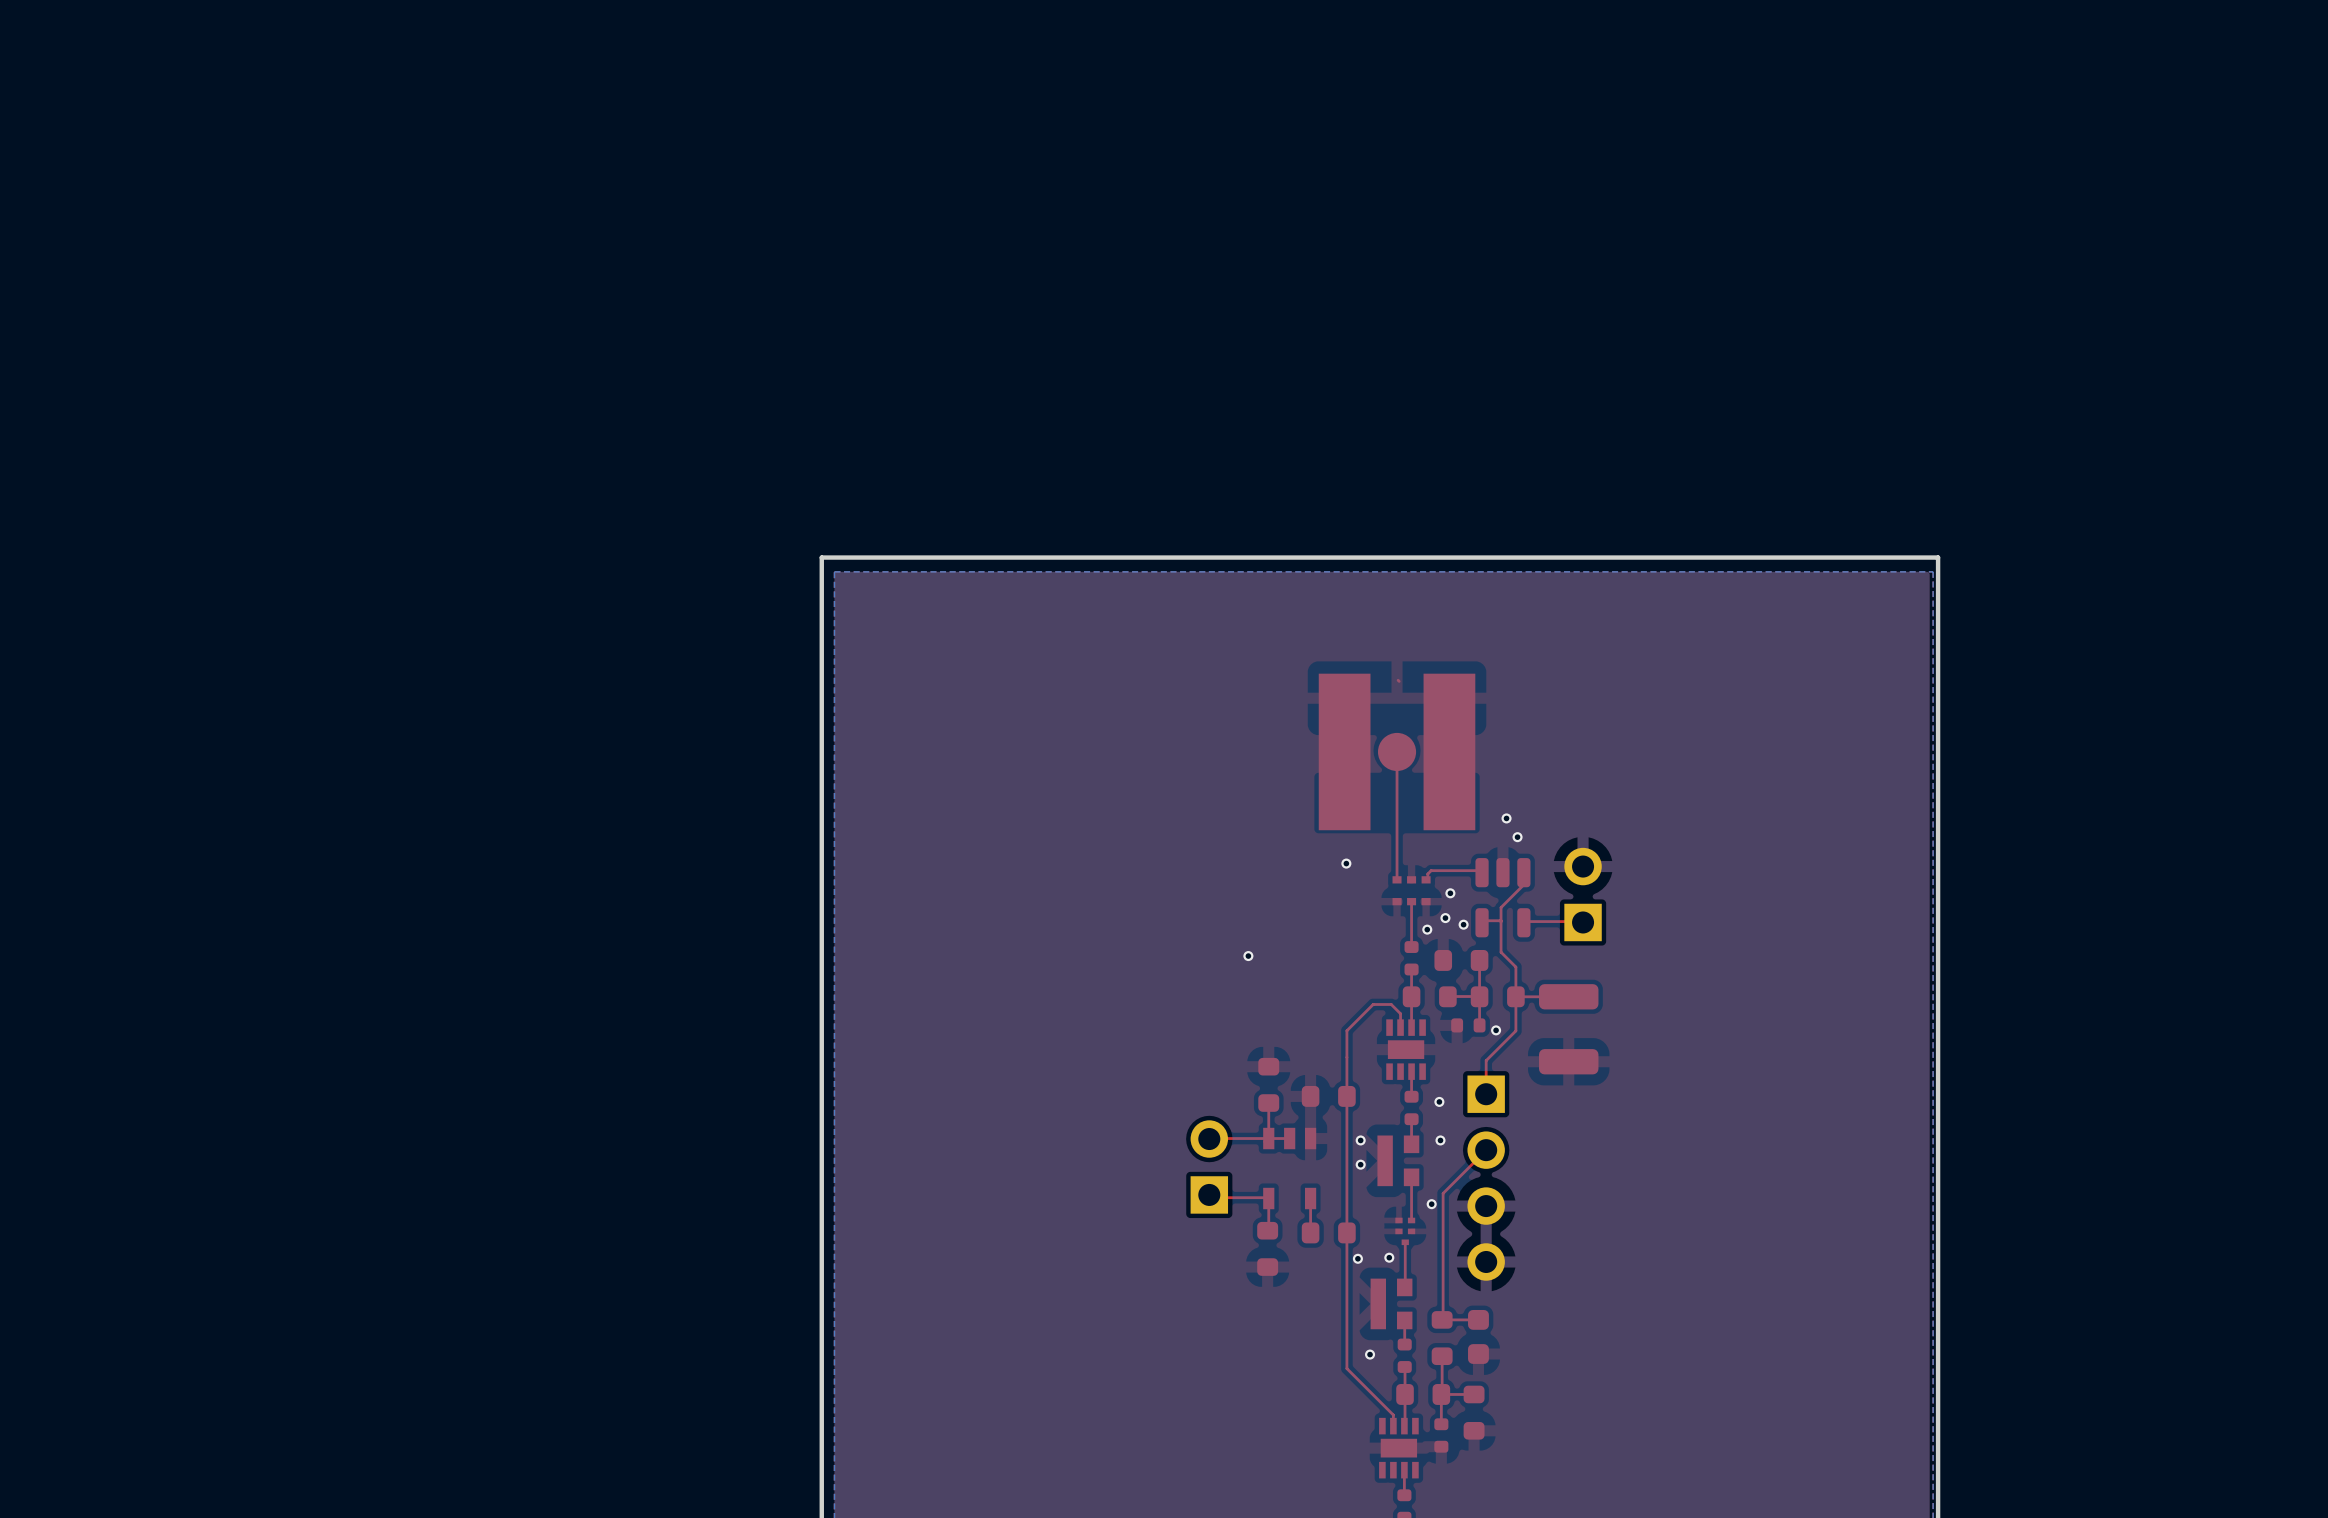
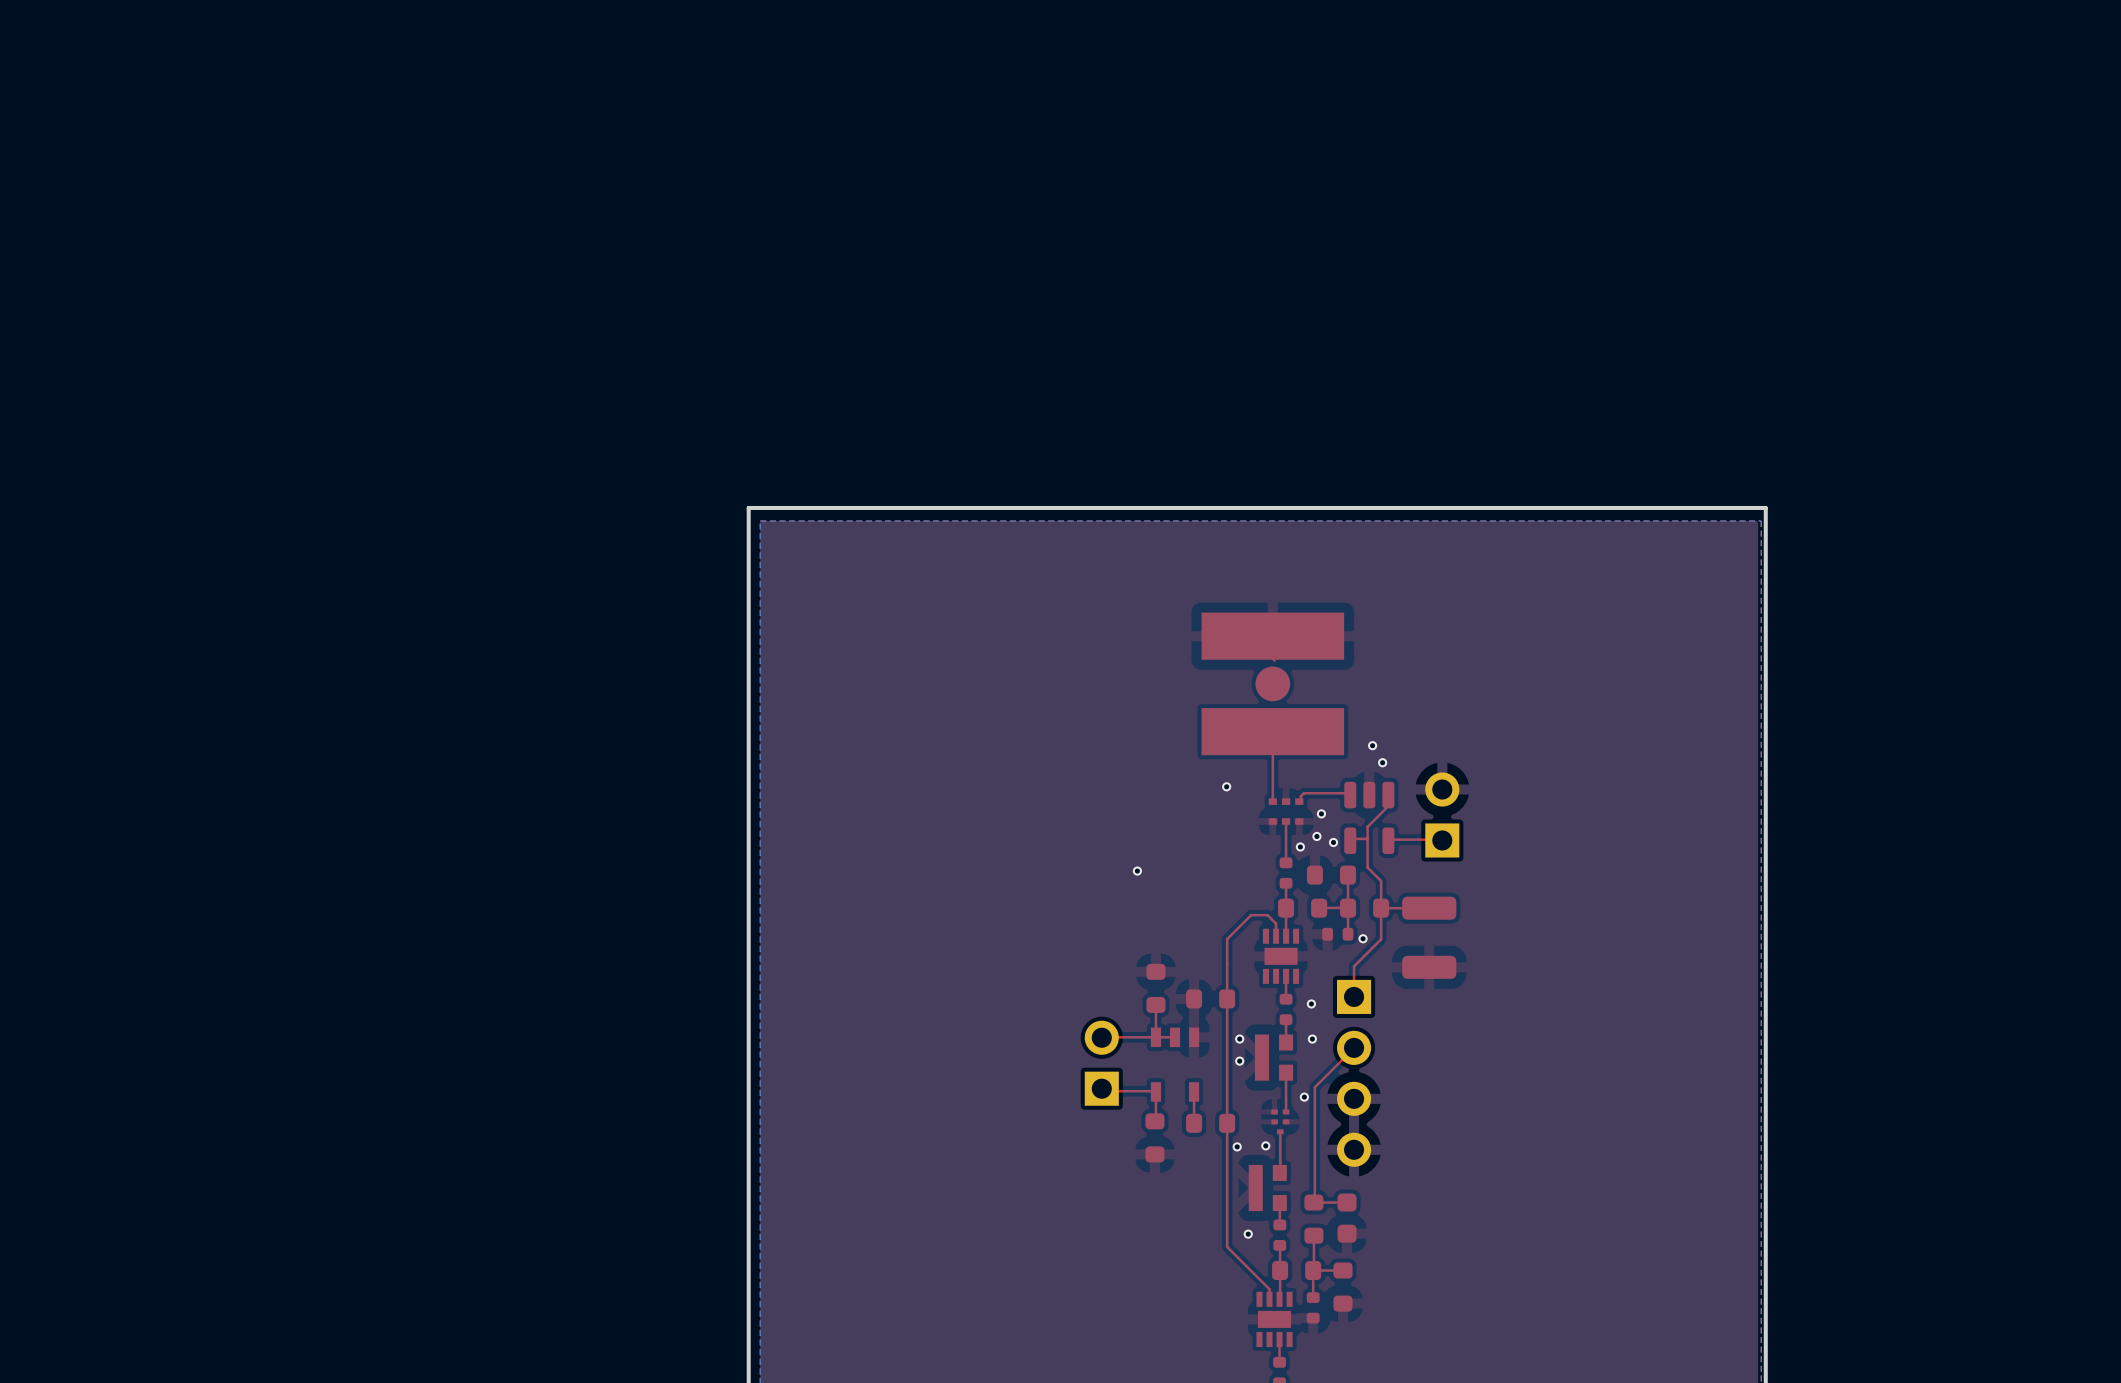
top track: none -> (1273, 659) (1274, 660)
top track: (1397, 751) (1397, 803) -> none
part rotation: 0° (1397, 751) -> 90° clockwise (1272, 683)

